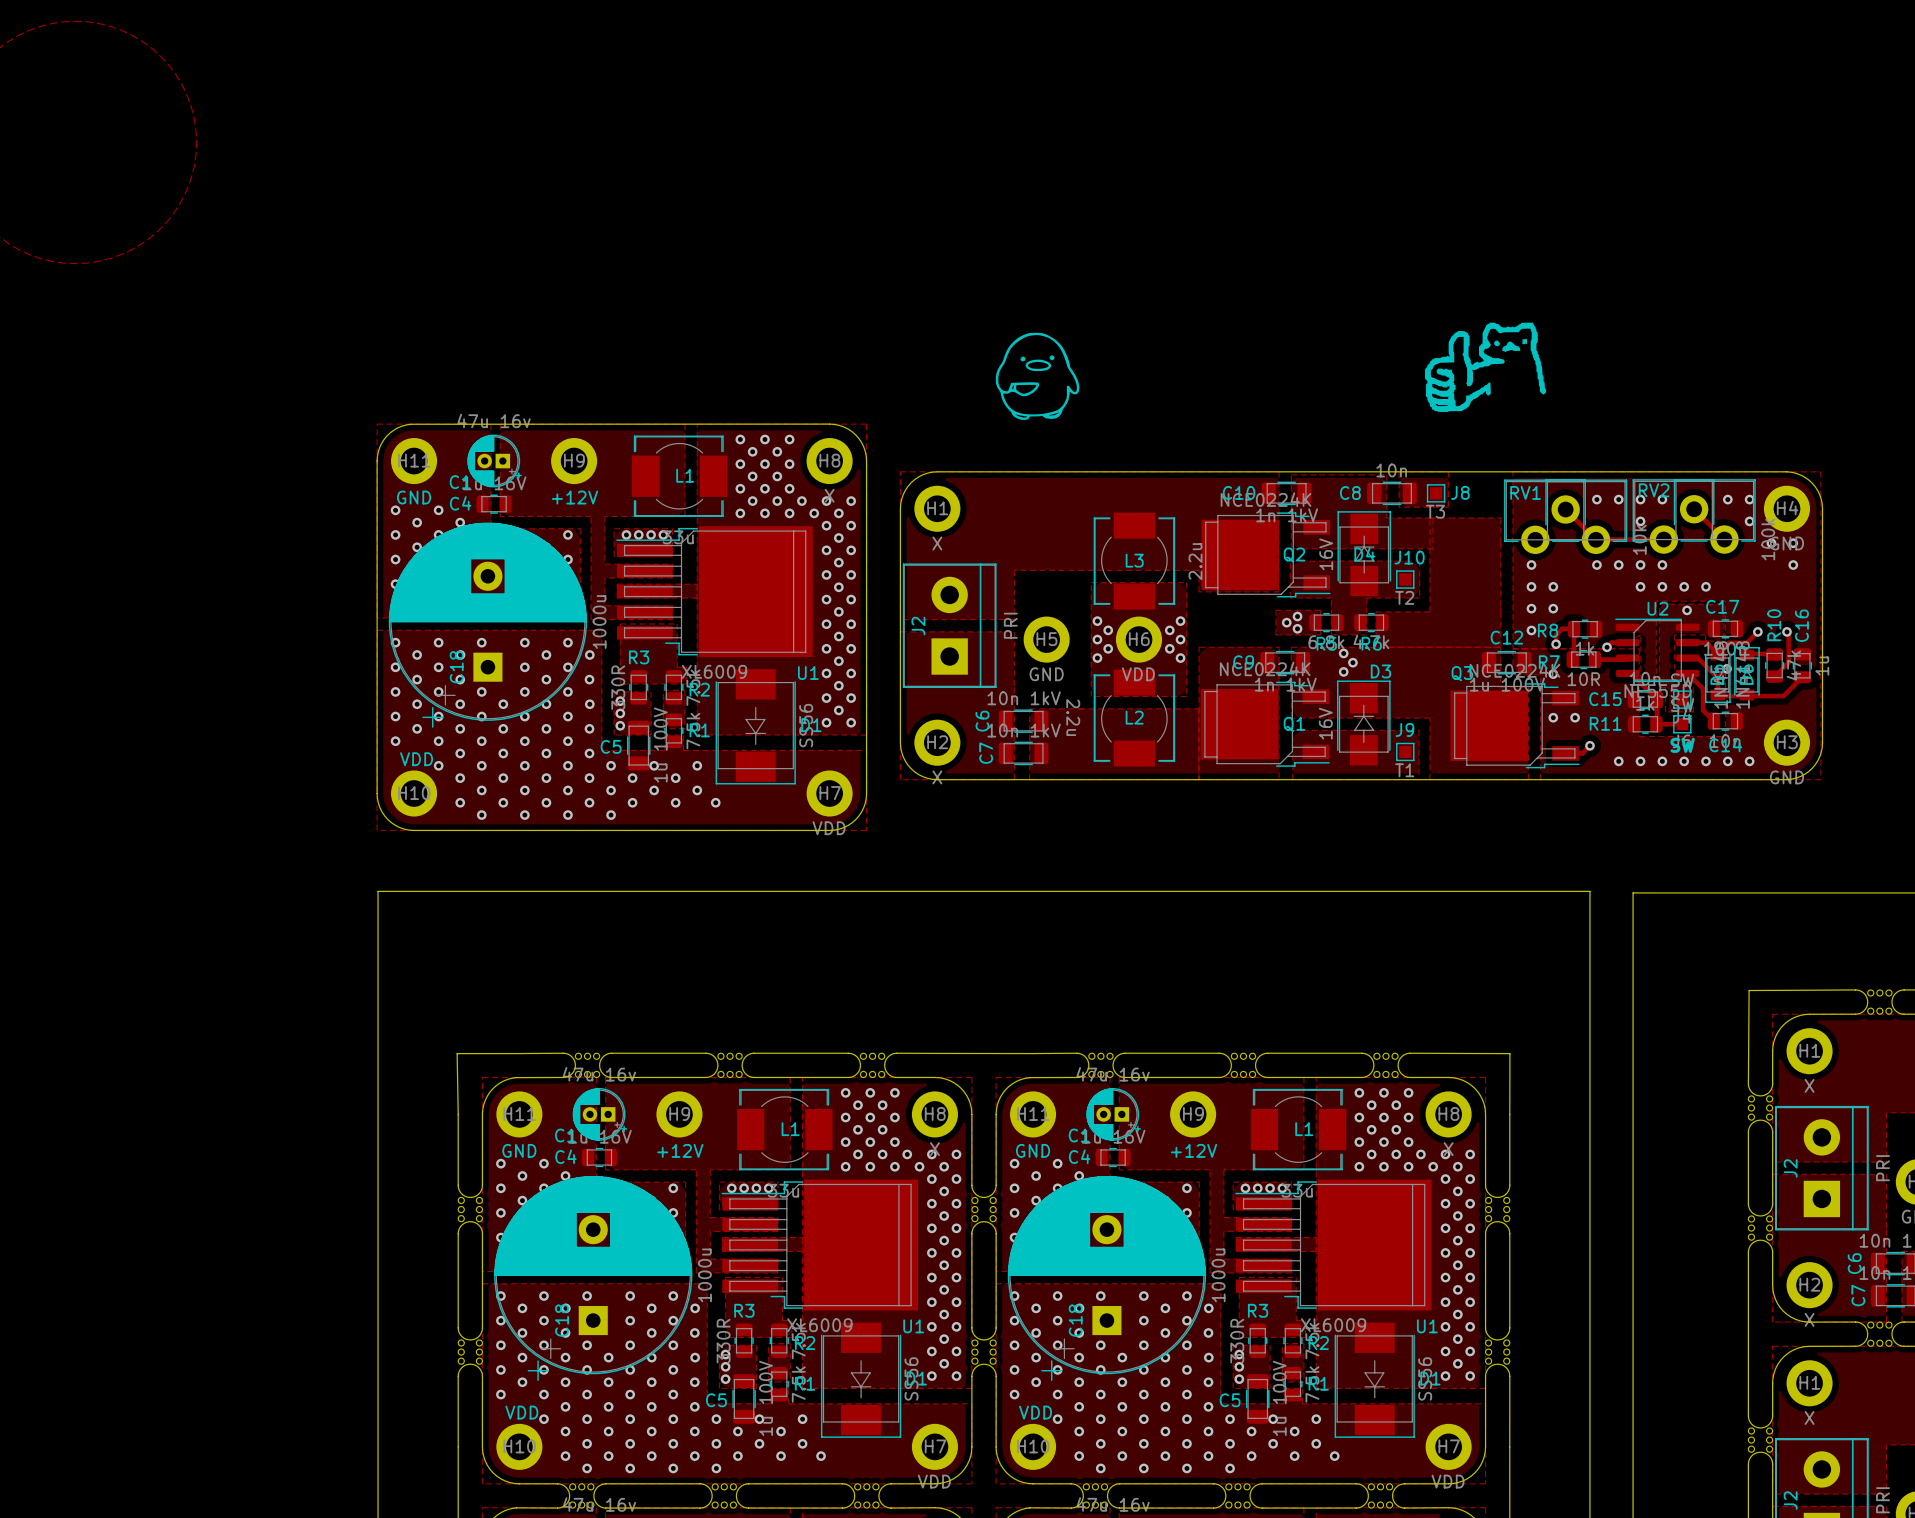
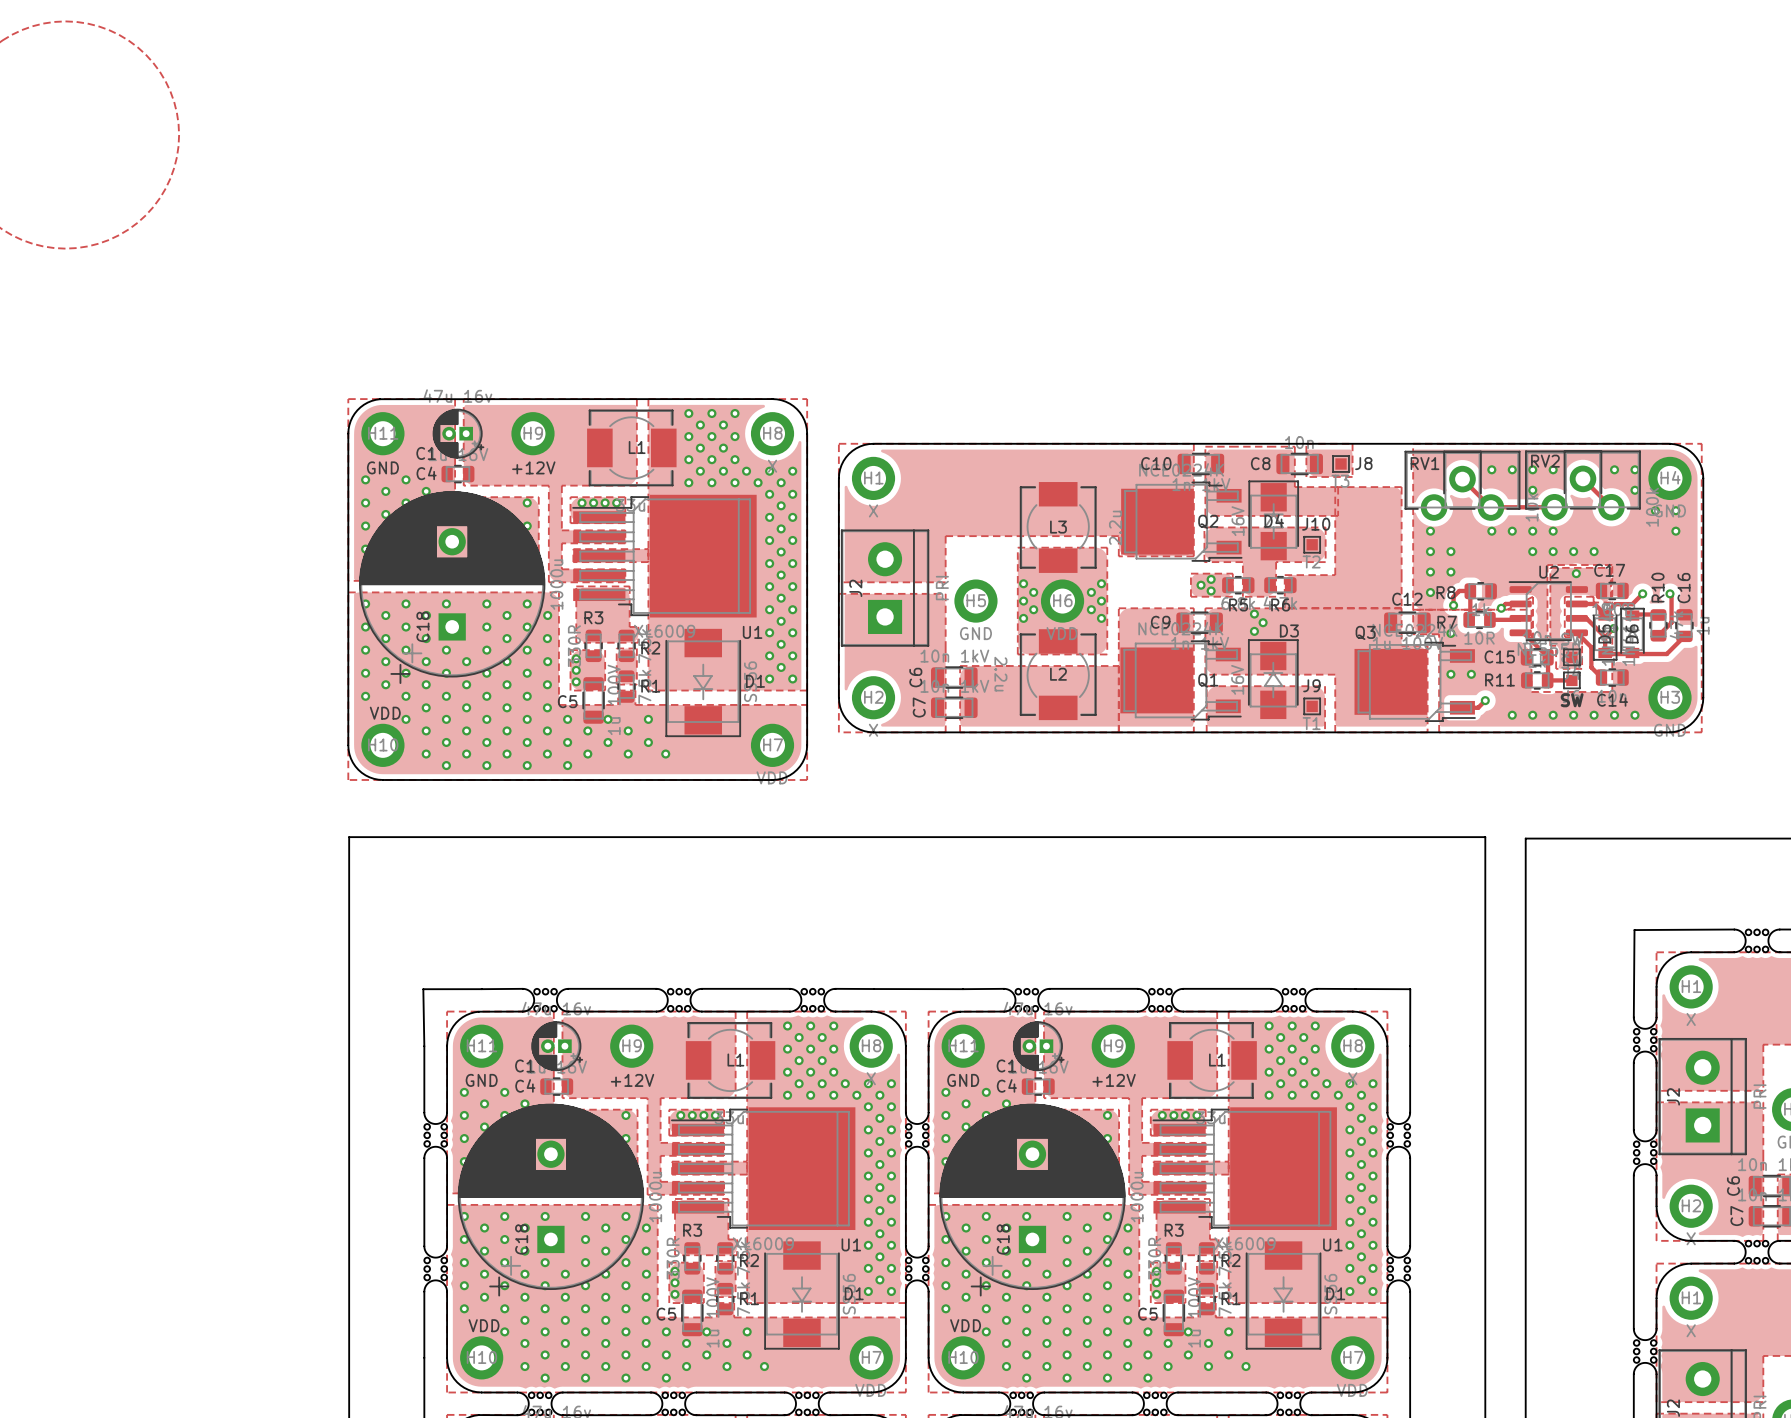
drawing: [1424, 322, 1547, 412] -> none
drawing: [995, 332, 1080, 420] -> none

